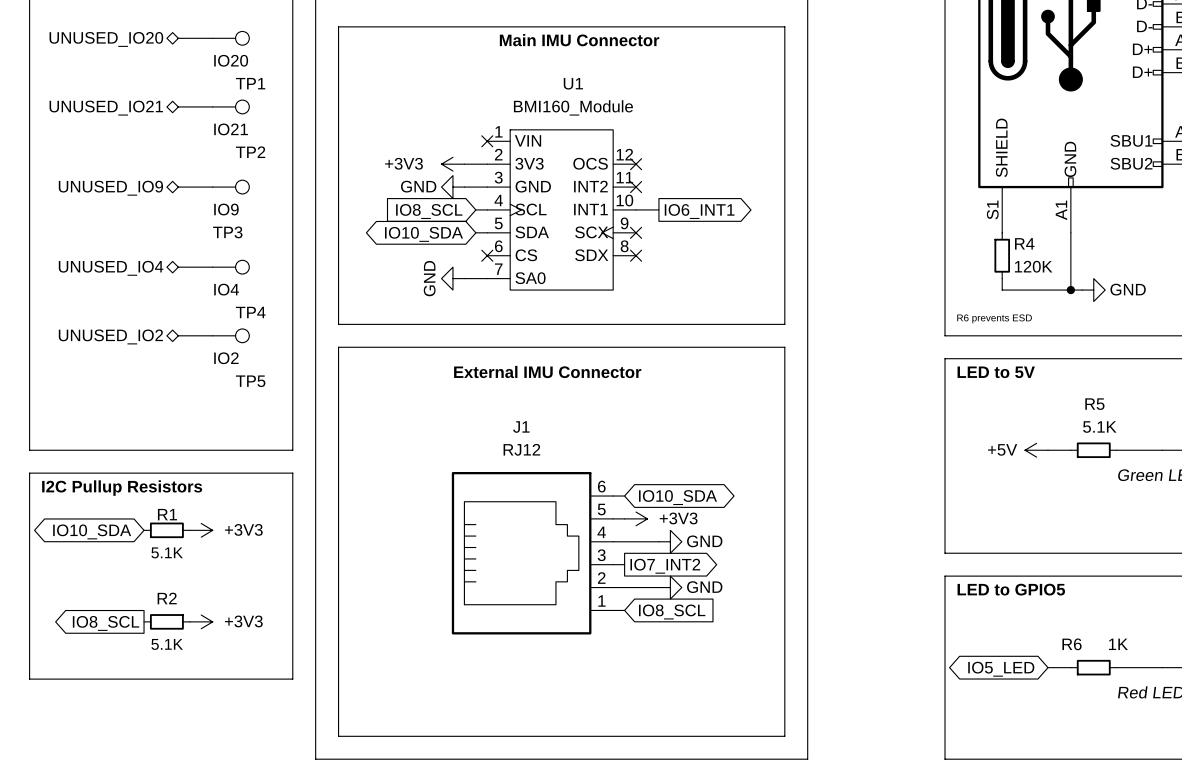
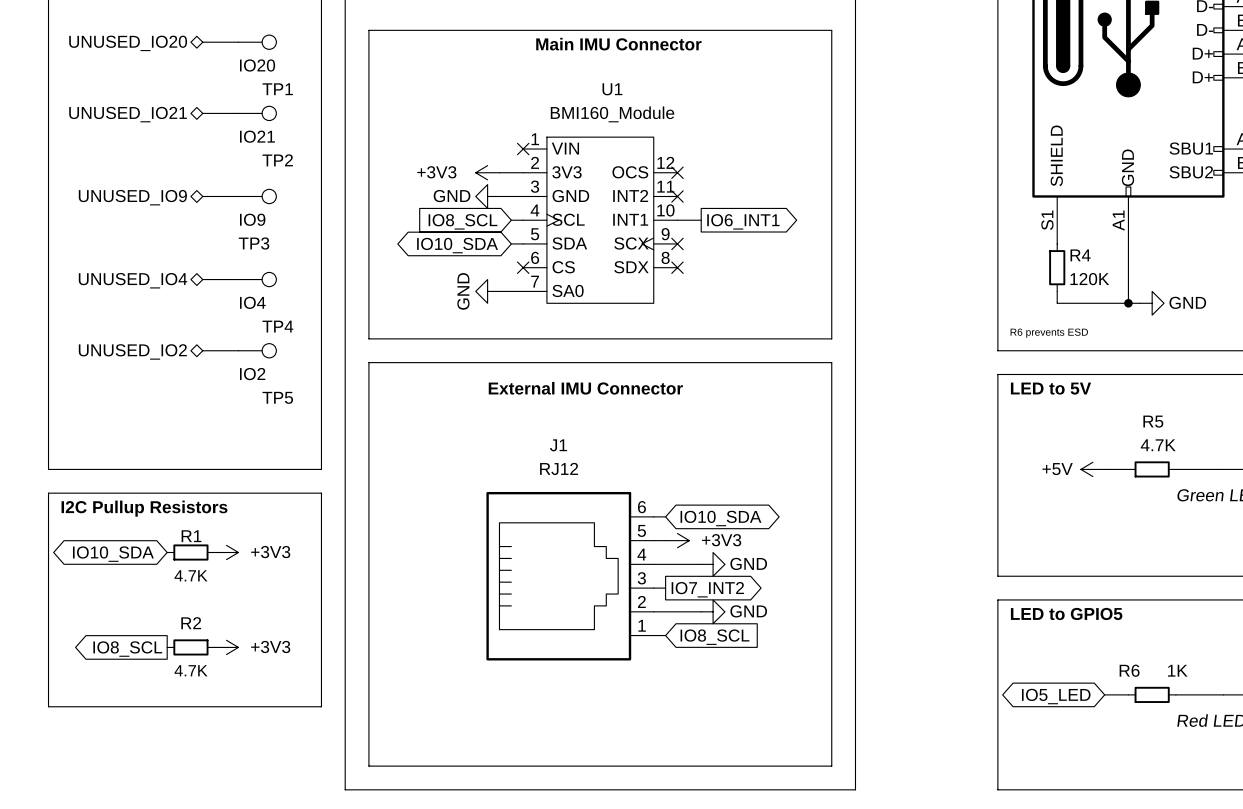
R5 value: 5.1K (1099, 427) -> 4.7K (1158, 445)
R1 value: 5.1K (167, 552) -> 4.7K (191, 575)
R2 value: 5.1K (167, 644) -> 4.7K (191, 670)

